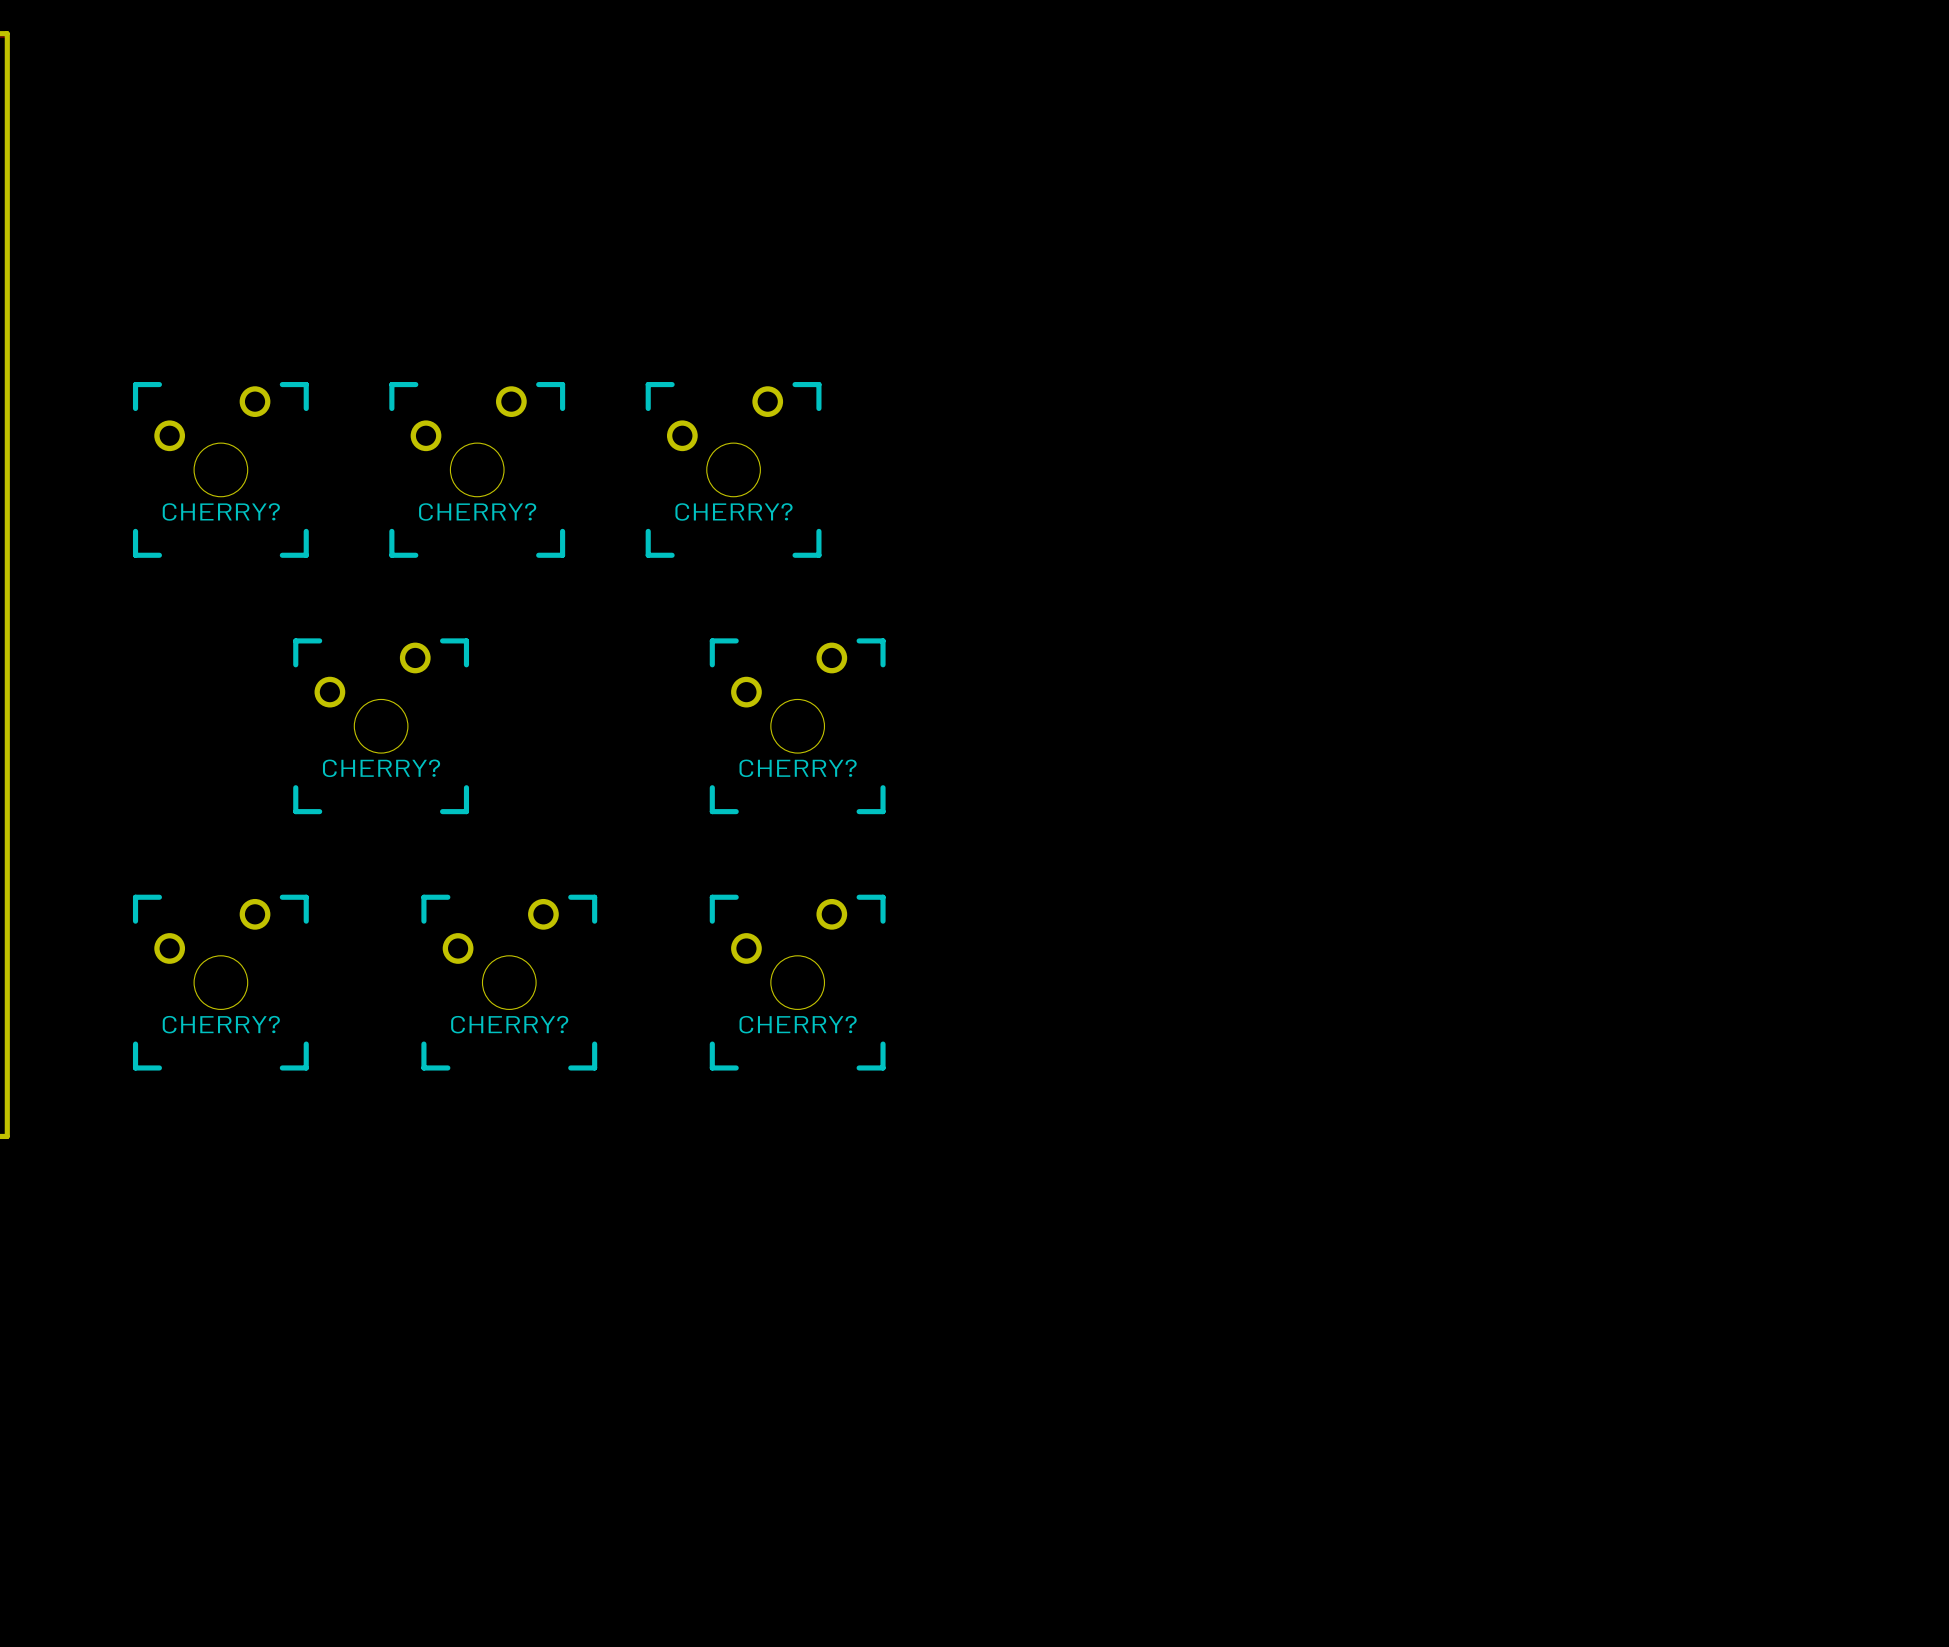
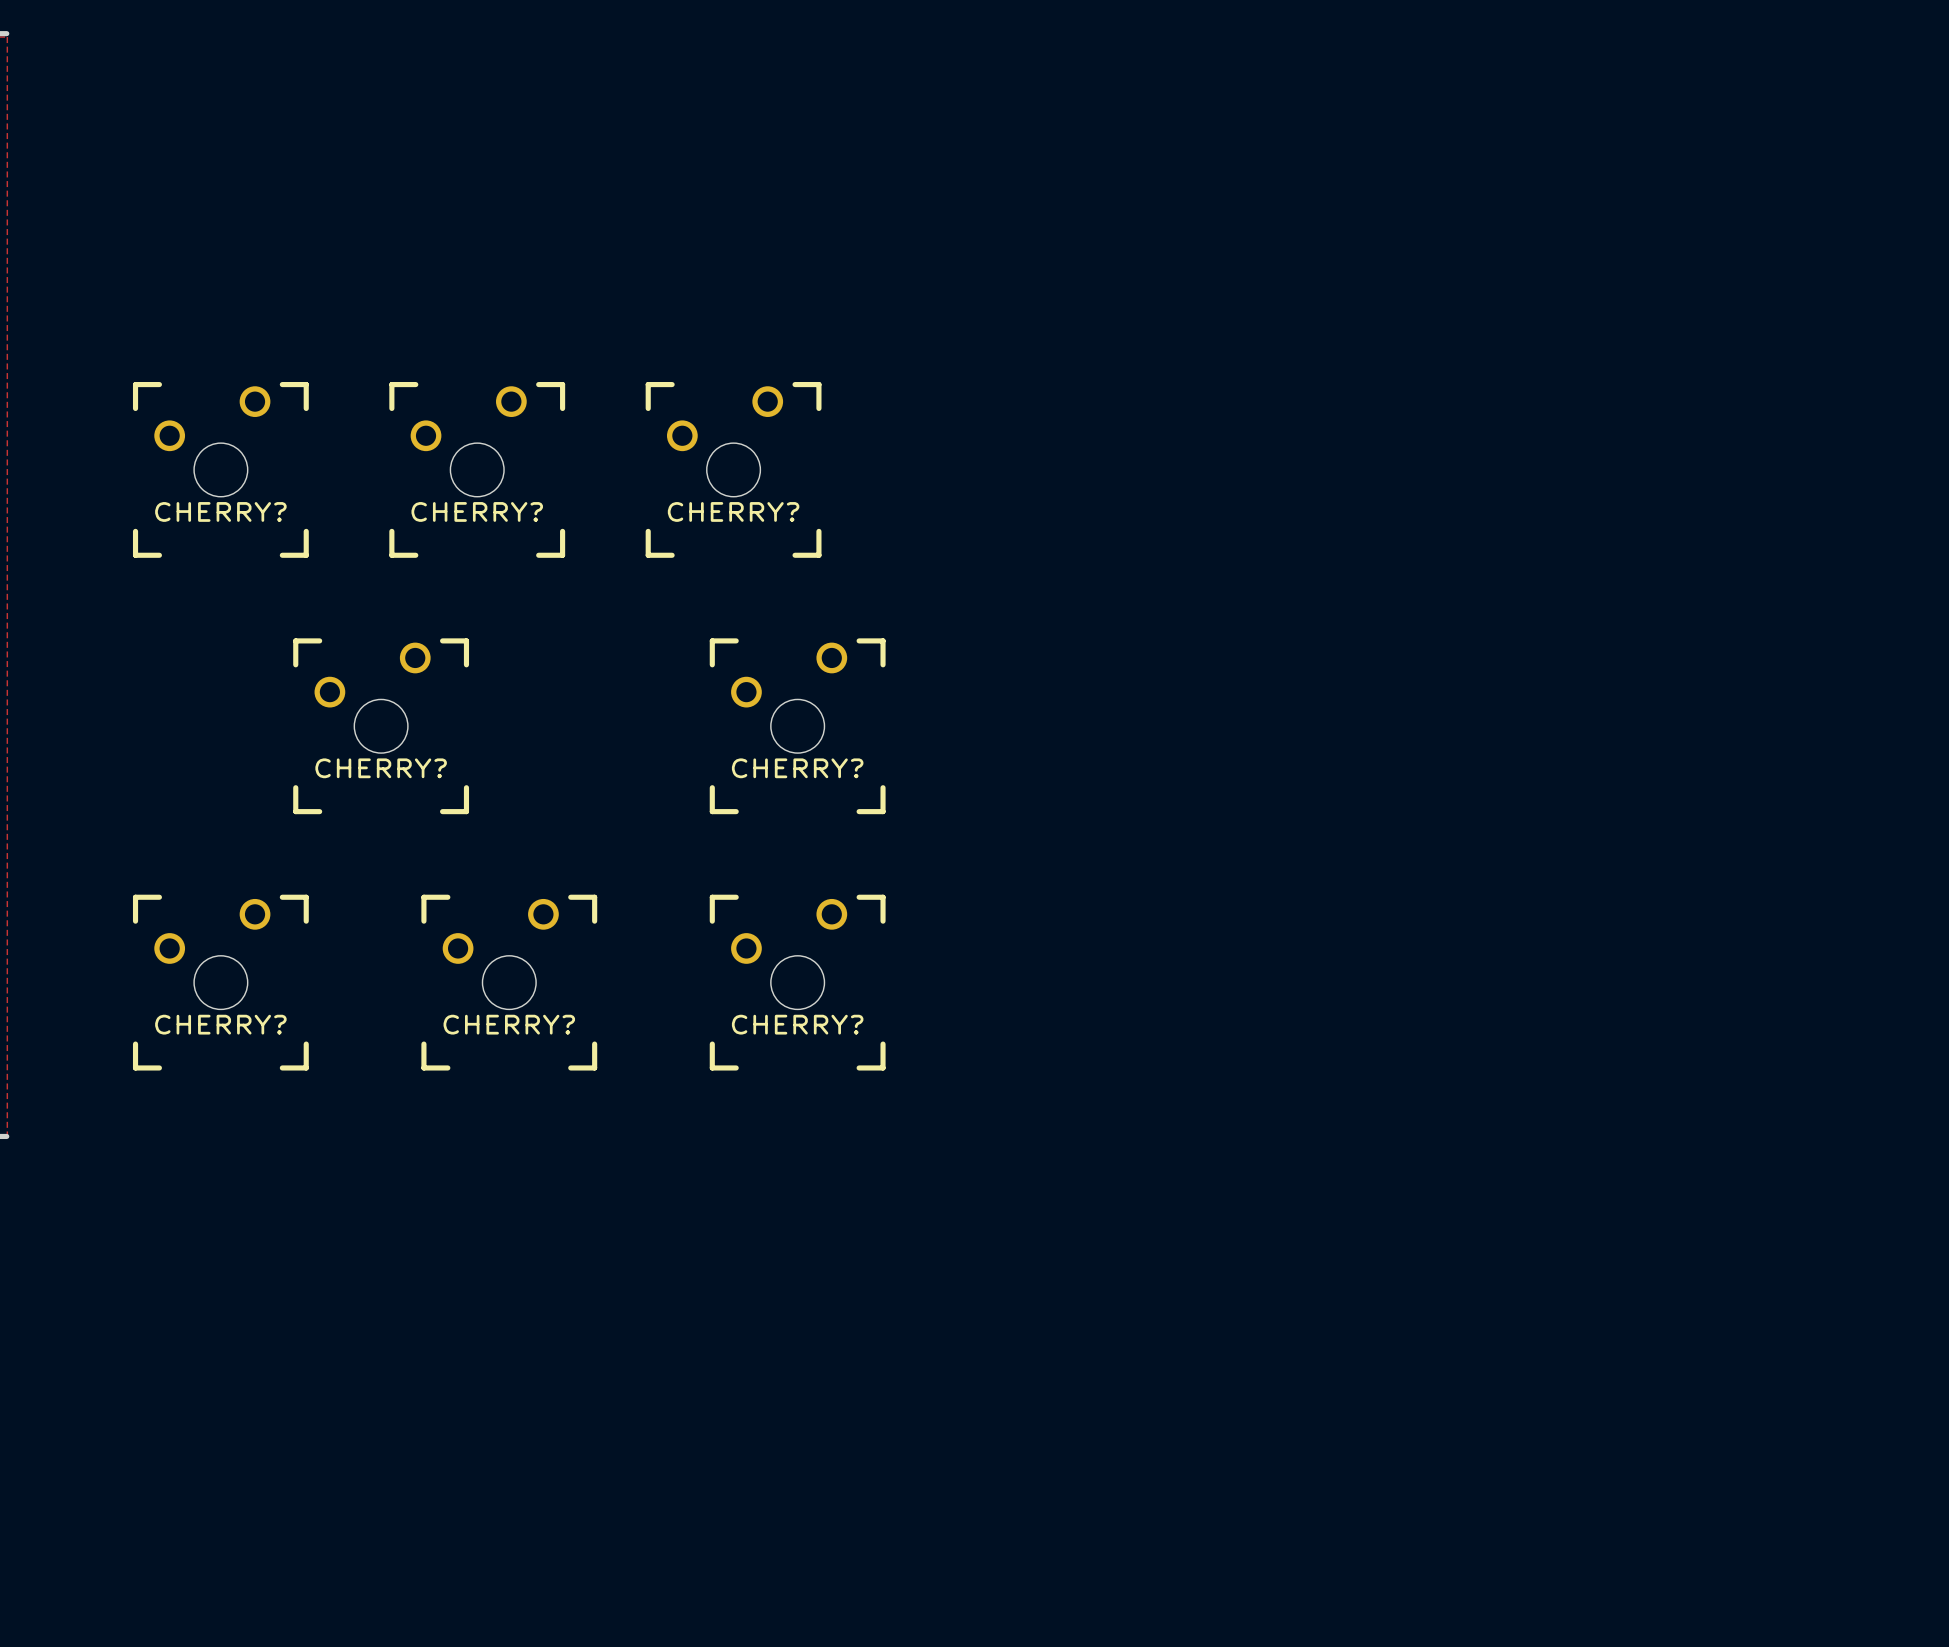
board edge: (7, 33) (7, 1136) -> none

